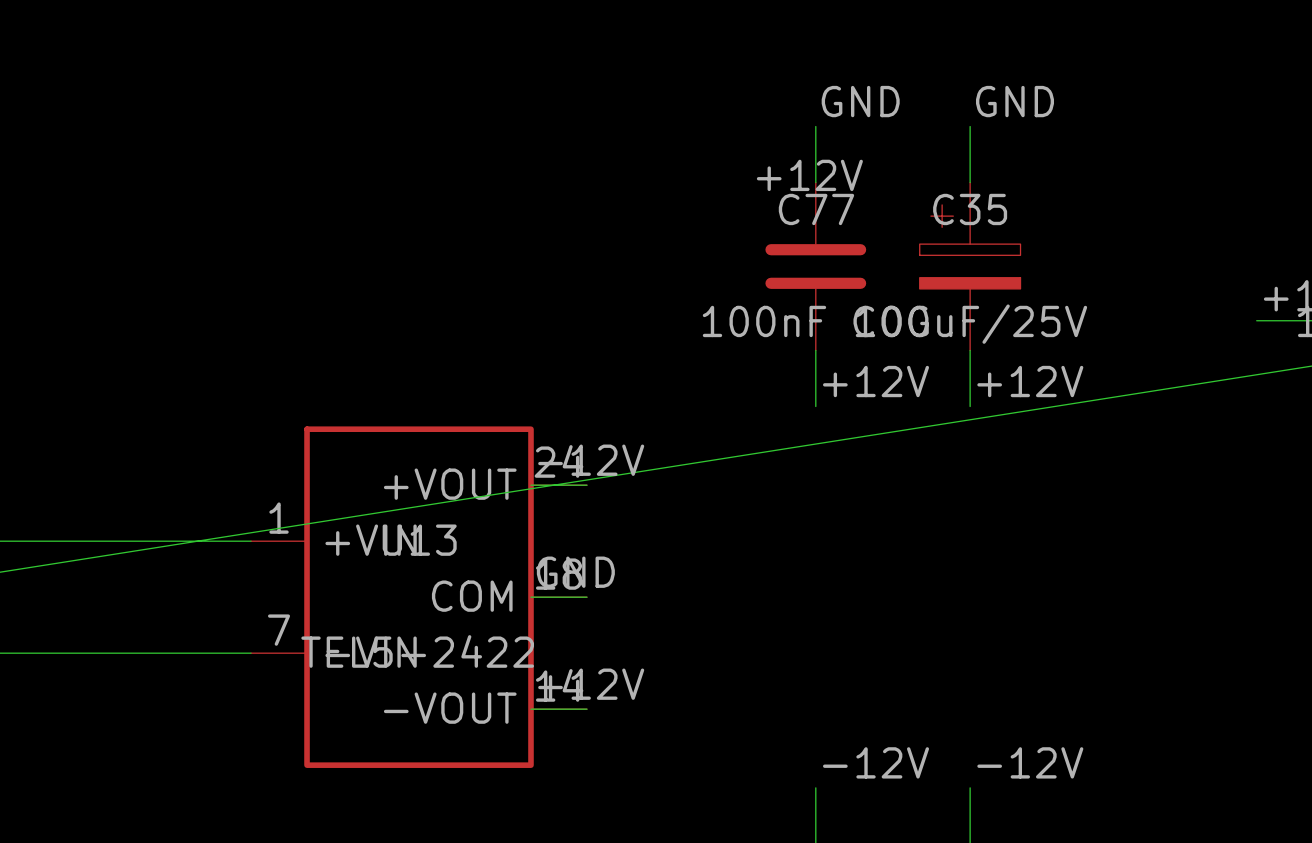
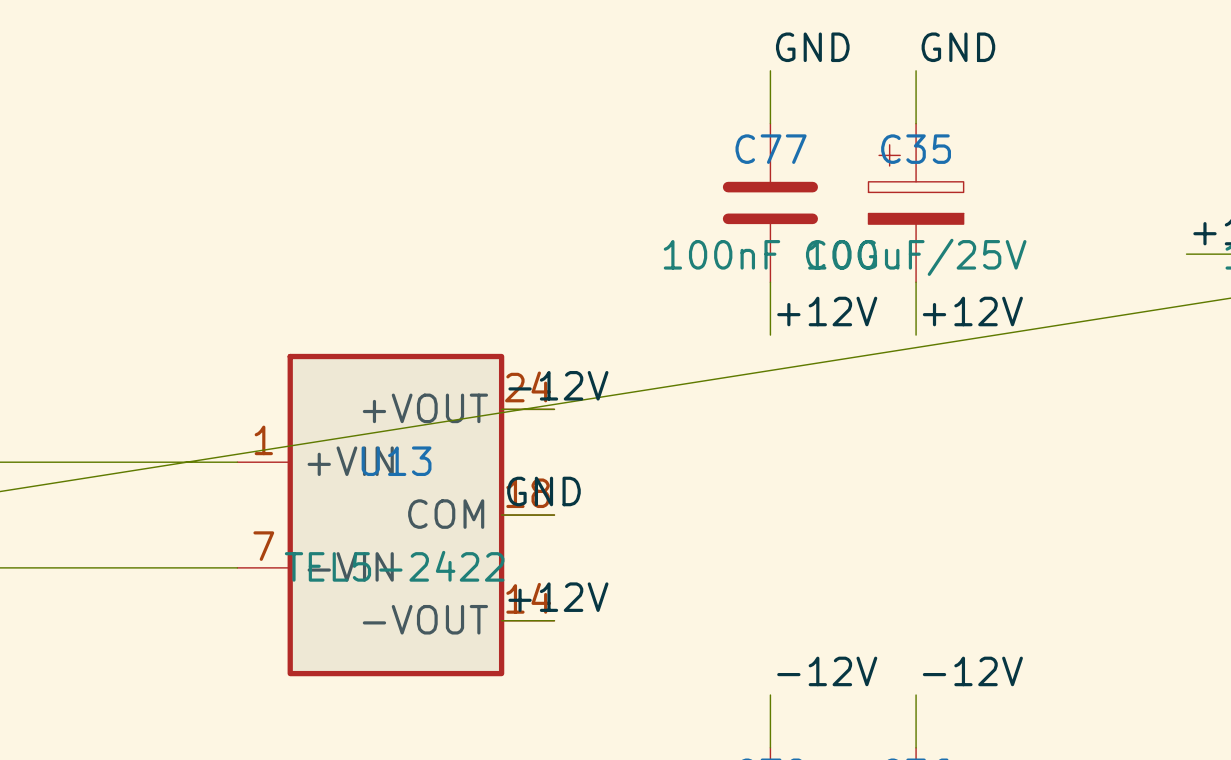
label: +12V (809, 175) -> none

